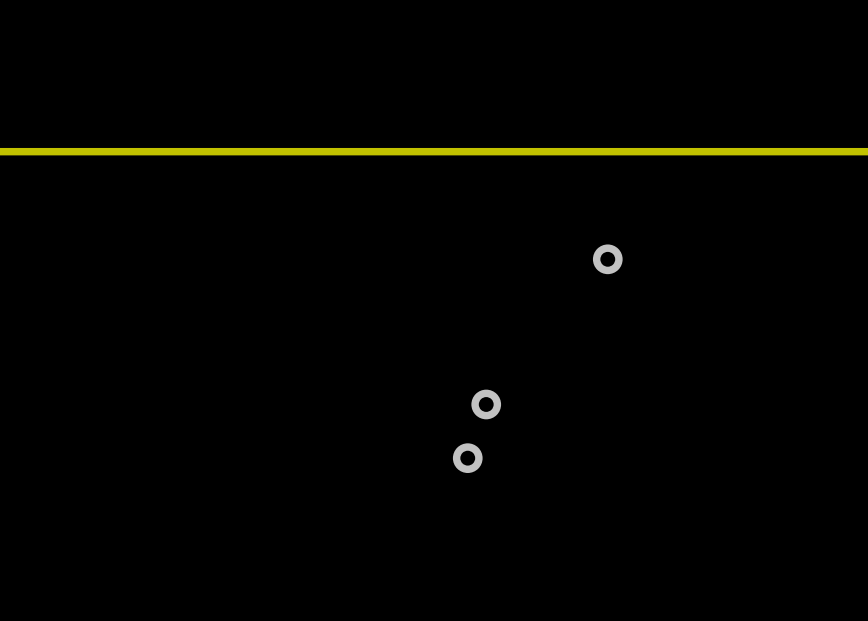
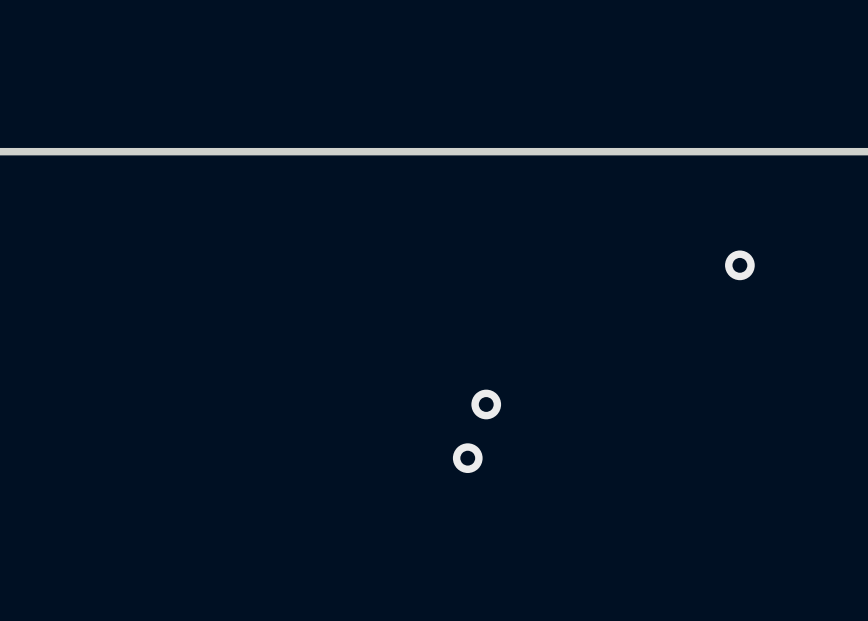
via position: (607, 259) -> (739, 265)

